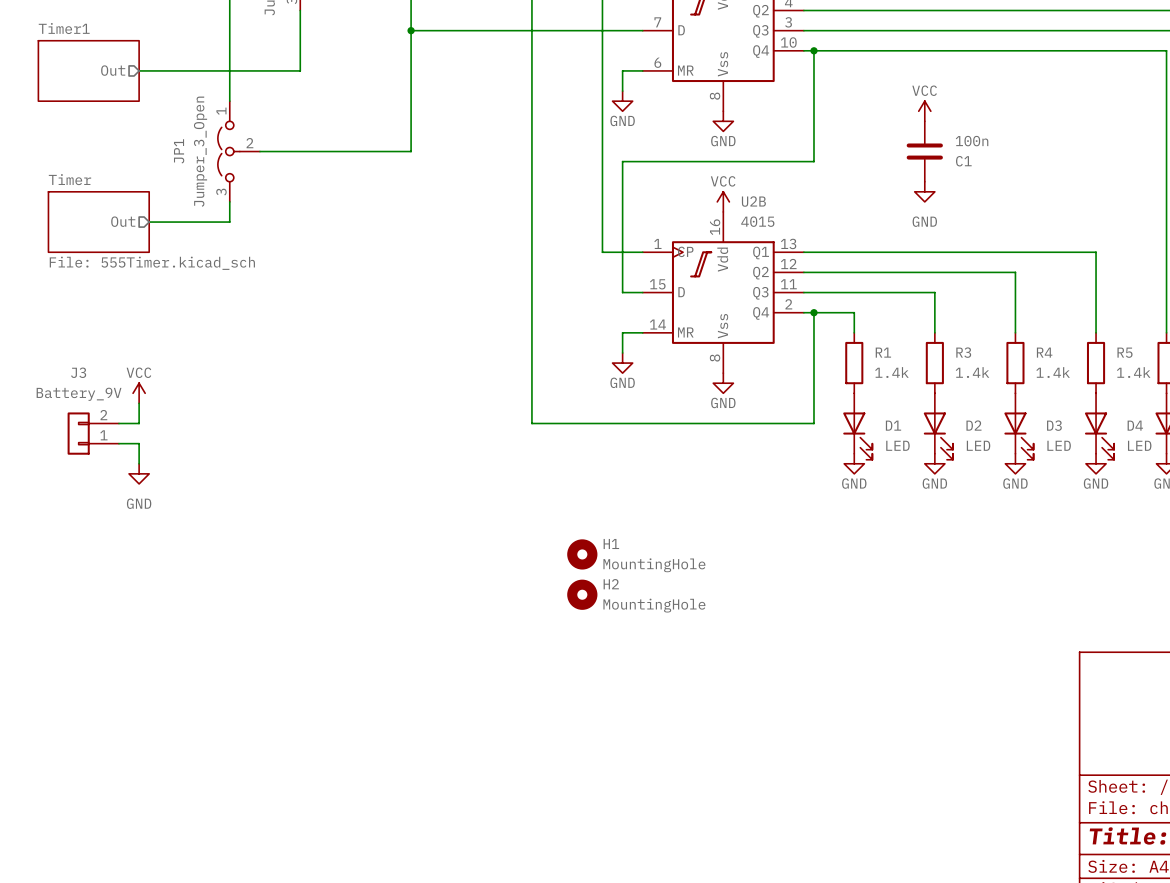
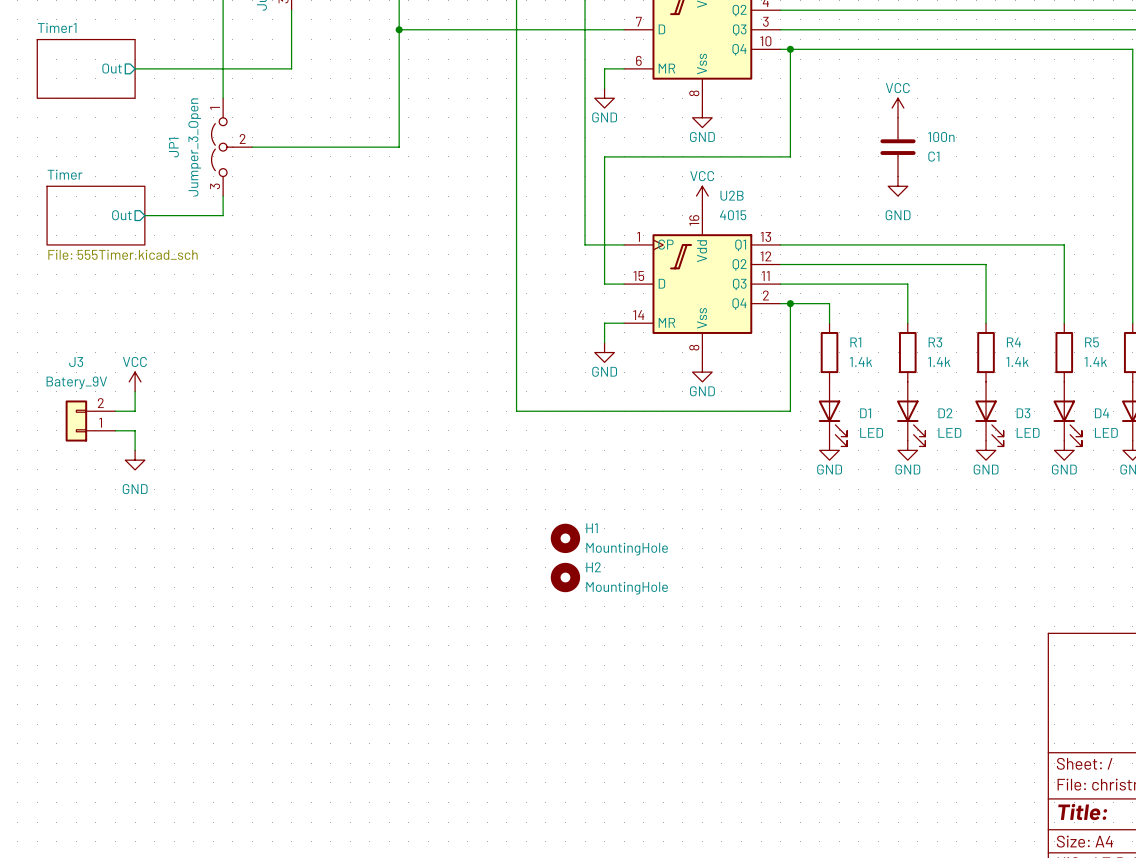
J3 value: Battery_9V (79, 394) -> Batery_9V (76, 382)

